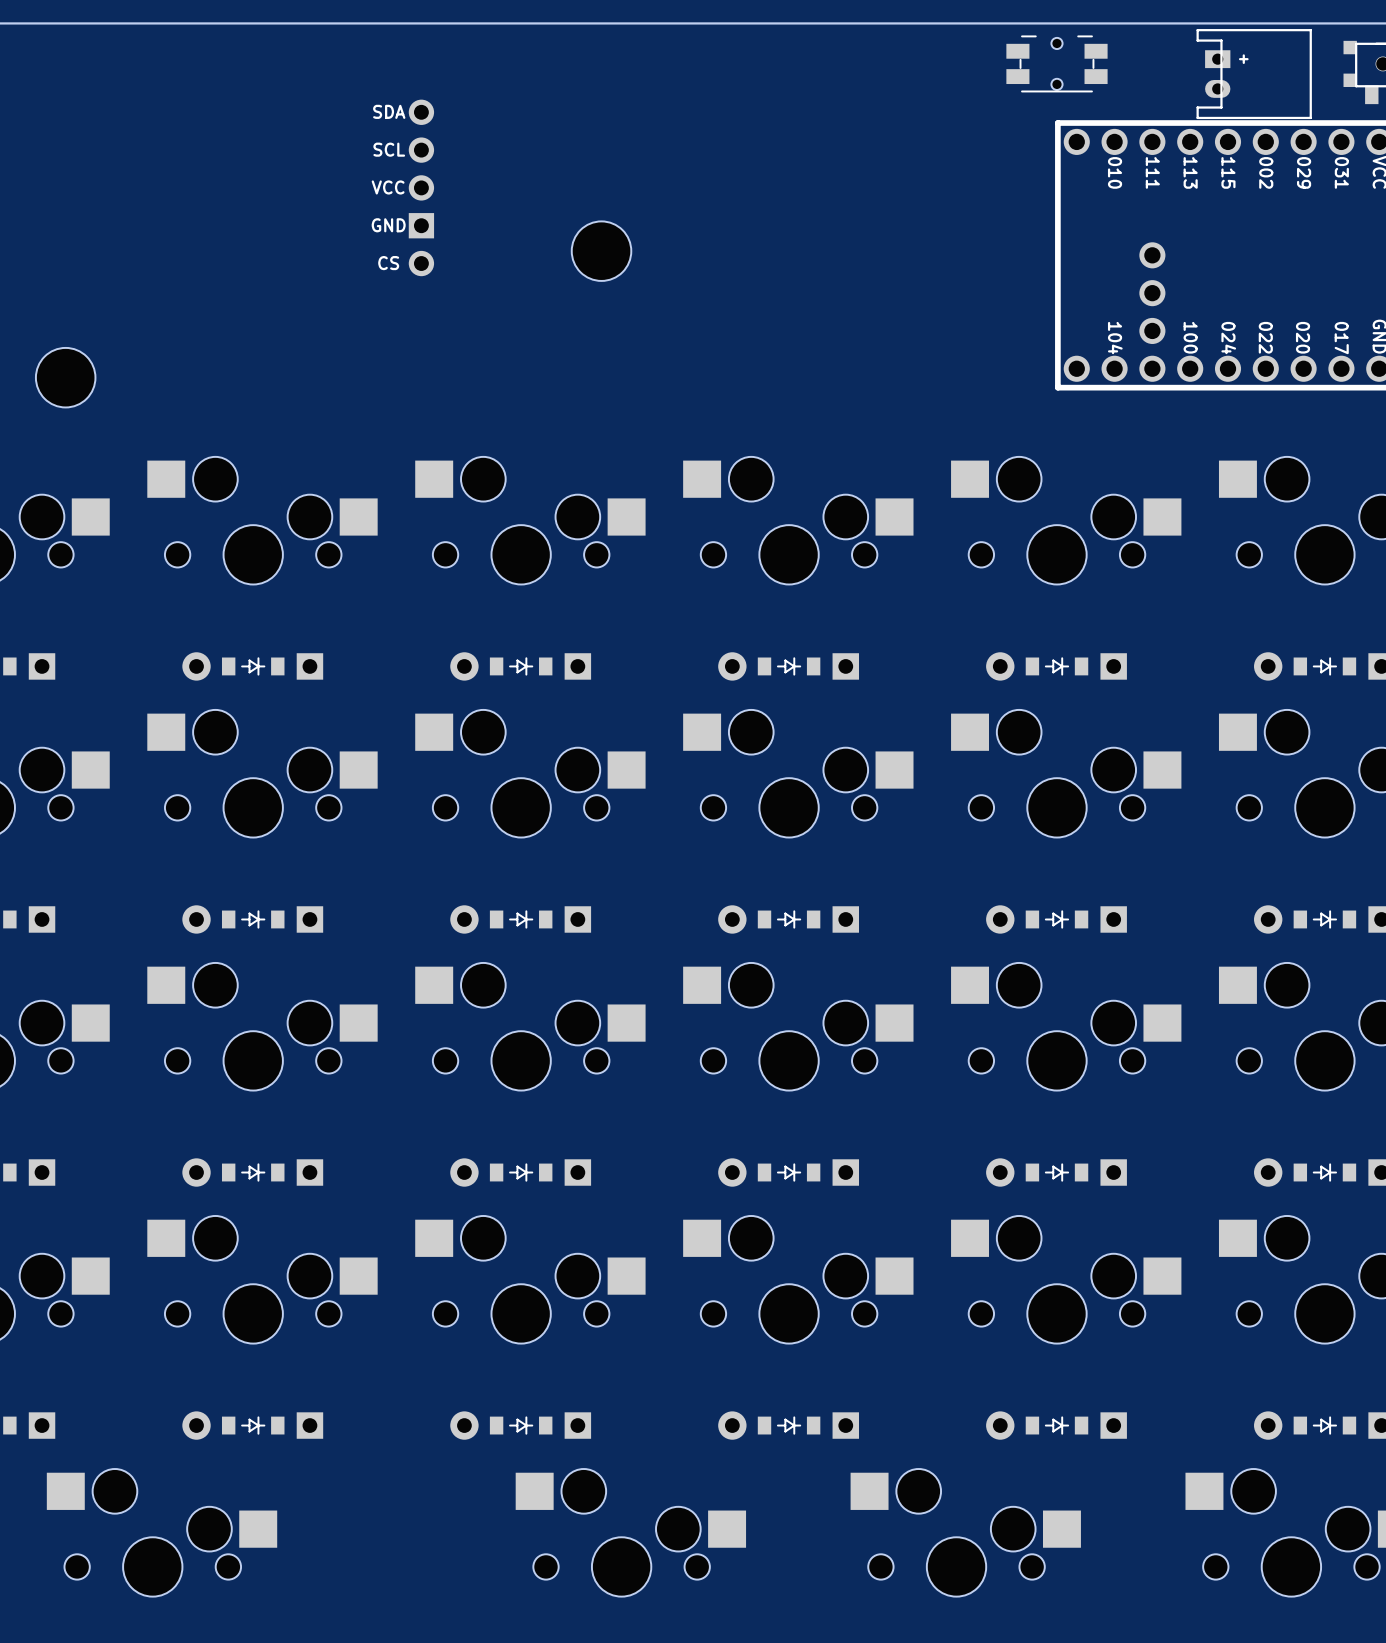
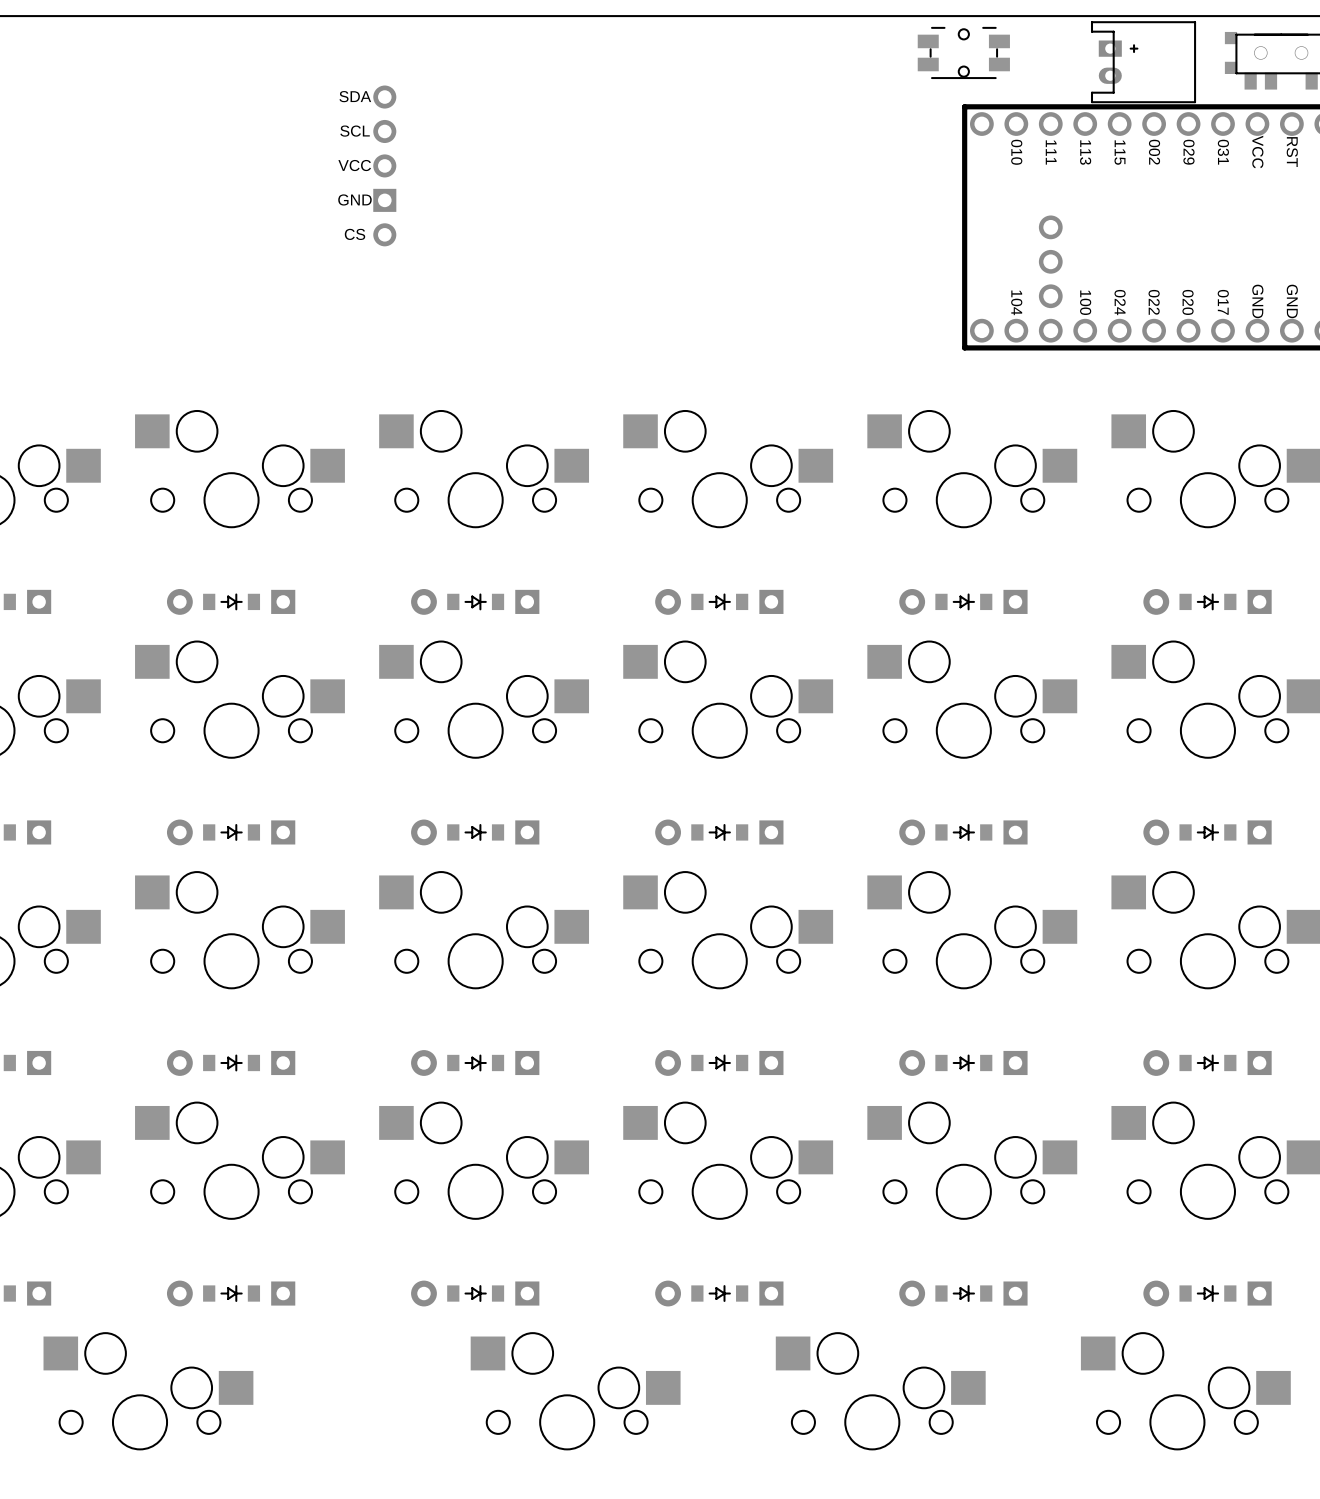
part: (601, 251) -> none
part: (65, 377) -> none

